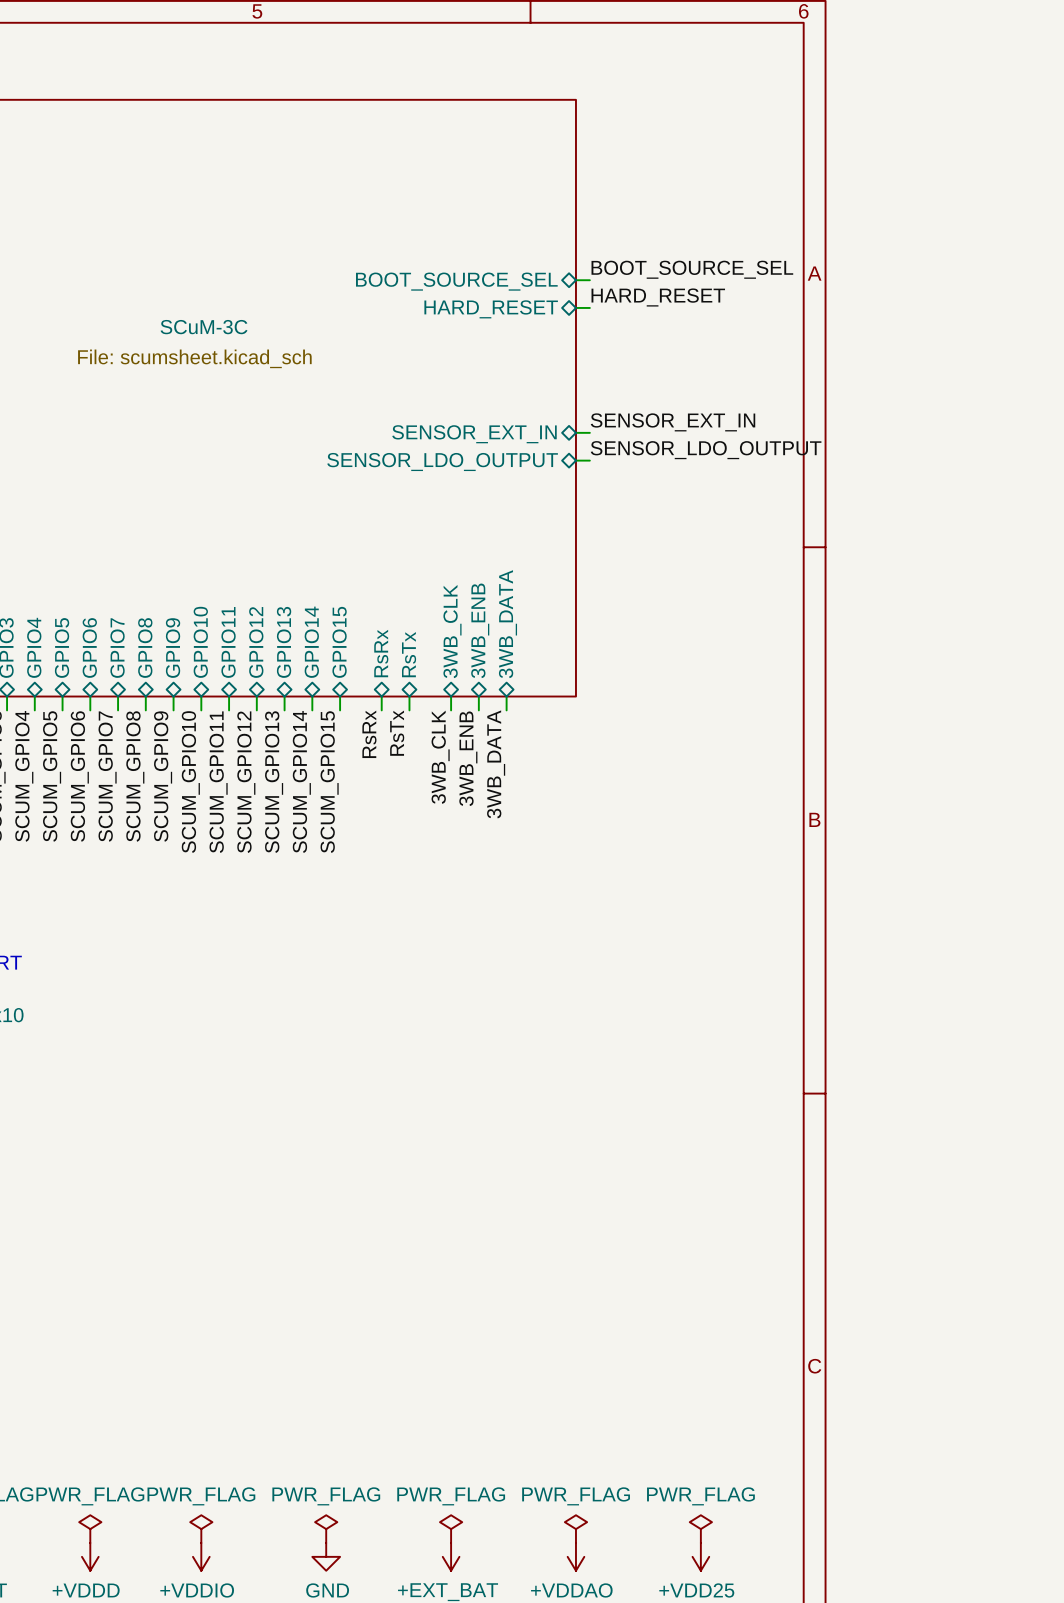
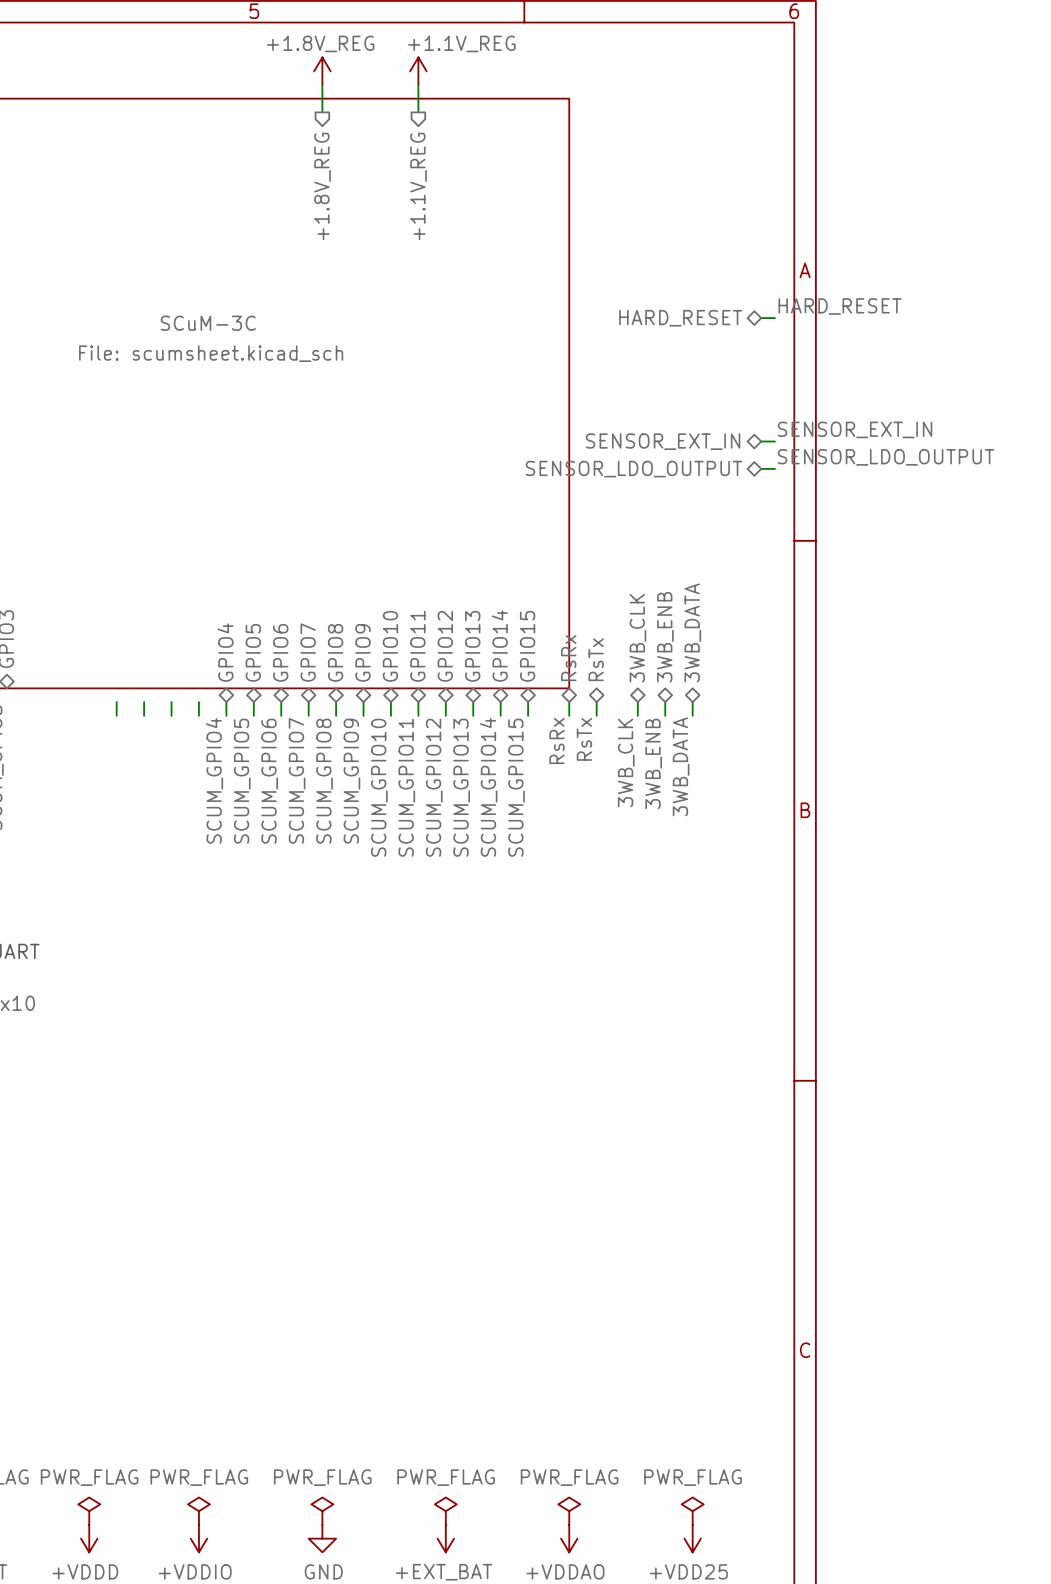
power symbol: none -> +1.8V_REG (322, 71)
power symbol: none -> +1.1V_REG (418, 71)
wire: none -> (322, 84) (322, 112)
wire: none -> (418, 84) (418, 112)
sheet pin: none -> +1.8V_REG (322, 186)
sheet pin: none -> +1.1V_REG (418, 186)
label: BOOT_SOURCE_SEL (692, 269) -> none
wire: (575, 280) (589, 280) -> none
sheet pin: BOOT_SOURCE_SEL (456, 281) -> none
label position: HARD_RESET (658, 297) -> HARD_RESET (840, 306)
wire: (575, 307) (589, 307) -> (761, 318) (774, 318)
sheet pin position: HARD_RESET (491, 309) -> HARD_RESET (680, 318)
label position: SENSOR_EXT_IN (673, 422) -> SENSOR_EXT_IN (855, 429)
wire: (575, 432) (589, 432) -> (761, 441) (774, 441)
sheet pin position: SENSOR_EXT_IN (474, 434) -> SENSOR_EXT_IN (663, 441)
label position: SENSOR_LDO_OUTPUT (706, 450) -> SENSOR_LDO_OUTPUT (886, 457)
wire: (575, 460) (589, 460) -> (761, 468) (774, 468)
sheet pin position: SENSOR_LDO_OUTPUT (442, 462) -> SENSOR_LDO_OUTPUT (634, 469)
sheet pin position: 3WB_DATA (507, 624) -> 3WB_DATA (692, 632)
sheet pin position: 3WB_ENB (480, 630) -> 3WB_ENB (665, 637)
sheet pin position: 3WB_CLK (452, 631) -> 3WB_CLK (637, 638)
sheet pin position: GPIO10 (200, 642) -> GPIO10 (390, 646)
sheet pin position: GPIO11 (228, 642) -> GPIO11 (417, 646)
sheet pin position: GPIO12 (256, 642) -> GPIO12 (445, 646)
sheet pin position: GPIO13 (284, 642) -> GPIO13 (472, 646)
sheet pin position: GPIO14 (311, 642) -> GPIO14 (499, 646)
sheet pin position: GPIO15 (339, 642) -> GPIO15 (527, 646)
sheet pin position: GPIO4 (34, 647) -> GPIO4 (225, 652)
sheet pin position: GPIO5 (62, 647) -> GPIO5 (253, 652)
sheet pin position: GPIO6 (89, 648) -> GPIO6 (280, 652)
sheet pin position: GPIO7 (117, 648) -> GPIO7 (308, 652)
sheet pin position: GPIO8 (145, 648) -> GPIO8 (335, 652)
sheet pin position: GPIO9 (173, 648) -> GPIO9 (363, 652)
sheet pin position: RsRx (381, 653) -> RsRx (568, 658)
sheet pin position: RsTx (409, 654) -> RsTx (596, 659)
wire: (7, 696) (7, 710) -> none
wire: (34, 696) (34, 710) -> none
wire: (62, 696) (62, 710) -> none
wire: (90, 696) (90, 710) -> none
wire: (118, 696) (118, 710) -> (116, 715) (116, 702)
wire: (145, 696) (145, 710) -> (144, 715) (144, 702)
wire: (173, 696) (173, 710) -> (171, 715) (171, 702)
wire: (201, 696) (201, 710) -> (198, 715) (198, 702)
wire: (229, 696) (229, 710) -> (226, 715) (226, 702)
wire: (256, 696) (256, 710) -> (253, 715) (253, 702)
wire: (284, 696) (284, 710) -> (281, 715) (281, 702)
wire: (312, 696) (312, 710) -> (308, 715) (308, 702)
wire: (340, 696) (340, 710) -> (336, 715) (336, 702)
wire: (381, 696) (381, 710) -> (569, 702) (569, 715)
wire: (409, 696) (409, 710) -> (596, 702) (596, 715)
wire: (451, 696) (451, 710) -> (445, 715) (445, 702)
wire: (478, 696) (478, 710) -> (473, 715) (473, 702)
wire: (506, 696) (506, 710) -> (500, 715) (500, 702)
wire: none -> (363, 702) (363, 715)
wire: none -> (390, 702) (390, 715)
wire: none -> (418, 702) (418, 715)
wire: none -> (528, 702) (528, 715)
wire: none -> (637, 702) (637, 715)
wire: none -> (665, 702) (665, 715)
wire: none -> (692, 702) (692, 715)
label position: RsTx (397, 733) -> RsTx (584, 739)
label position: RsRx (369, 734) -> RsRx (557, 741)
label position: 3WB_CLK (440, 757) -> 3WB_CLK (626, 762)
label position: 3WB_ENB (468, 758) -> 3WB_ENB (653, 763)
label position: 3WB_DATA (496, 764) -> 3WB_DATA (681, 766)
label position: SCUM_GPIO4 (24, 776) -> SCUM_GPIO4 (214, 780)
label position: SCUM_GPIO5 (52, 776) -> SCUM_GPIO5 (242, 781)
label position: SCUM_GPIO6 (79, 776) -> SCUM_GPIO6 (269, 781)
label position: SCUM_GPIO7 (107, 776) -> SCUM_GPIO7 (297, 780)
label position: SCUM_GPIO8 (135, 776) -> SCUM_GPIO8 (324, 781)
label position: SCUM_GPIO9 (163, 776) -> SCUM_GPIO9 (351, 781)
label position: SCUM_GPIO14 (301, 781) -> SCUM_GPIO14 (488, 787)
label position: SCUM_GPIO10 (190, 782) -> SCUM_GPIO10 (379, 787)
label position: SCUM_GPIO11 (218, 782) -> SCUM_GPIO11 (406, 787)
label position: SCUM_GPIO12 (246, 782) -> SCUM_GPIO12 (434, 787)
label position: SCUM_GPIO13 (274, 782) -> SCUM_GPIO13 (461, 787)
label position: SCUM_GPIO15 (329, 782) -> SCUM_GPIO15 (516, 787)

